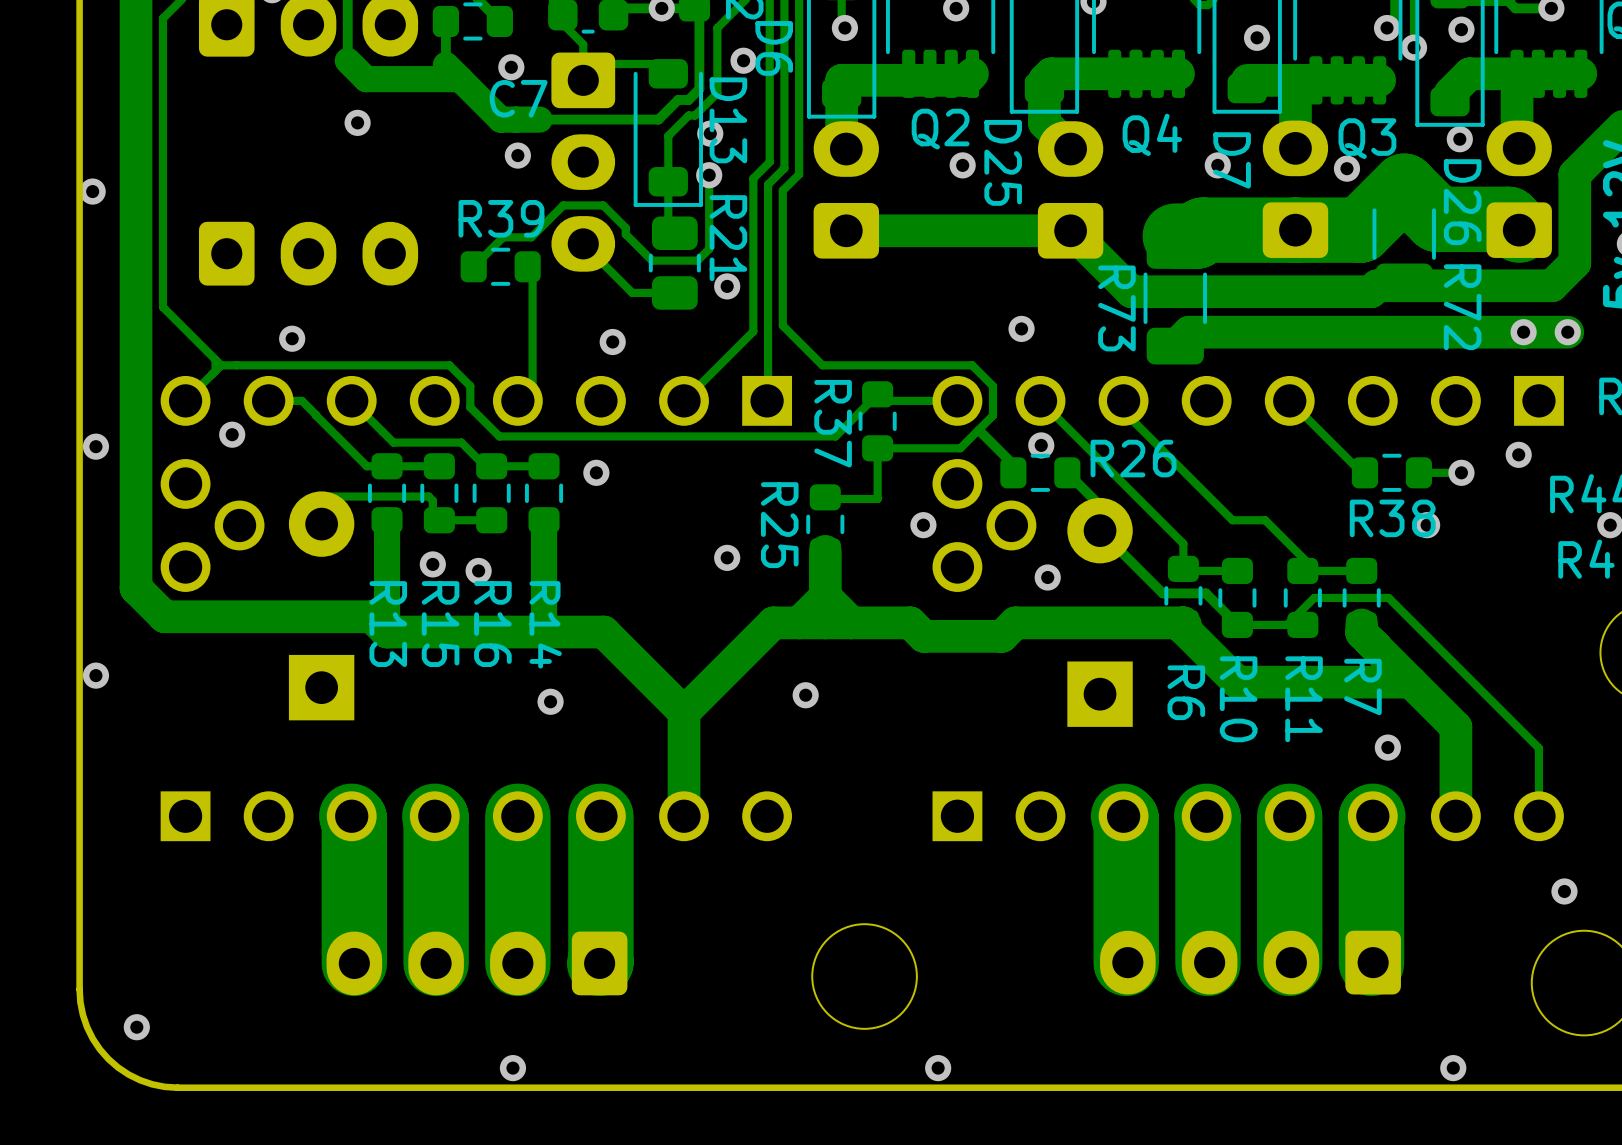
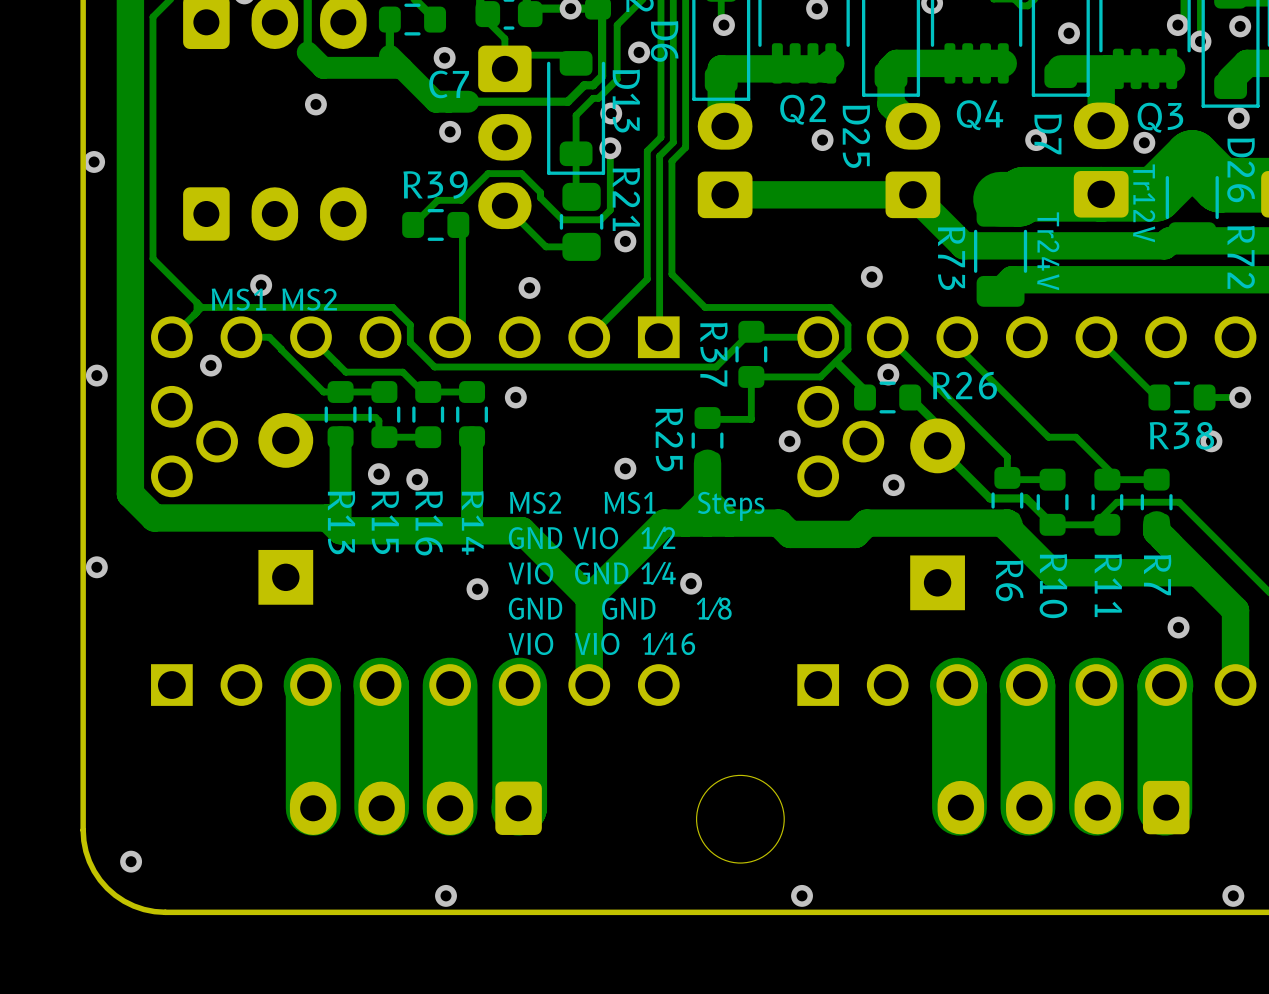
text: none -> Tr12V (1144, 203)
text: none -> Tr24V (1048, 251)
text: none -> MS1 MS2 (274, 299)
text: none -> MS2 MS1 Steps (637, 506)
text: none -> GND VIO 1⁄2 (592, 538)
text: none -> VIO GND 1⁄4 (592, 573)
text: none -> GND GND 1⁄8 (620, 608)
text: none -> VIO VIO 1⁄16 (601, 643)

